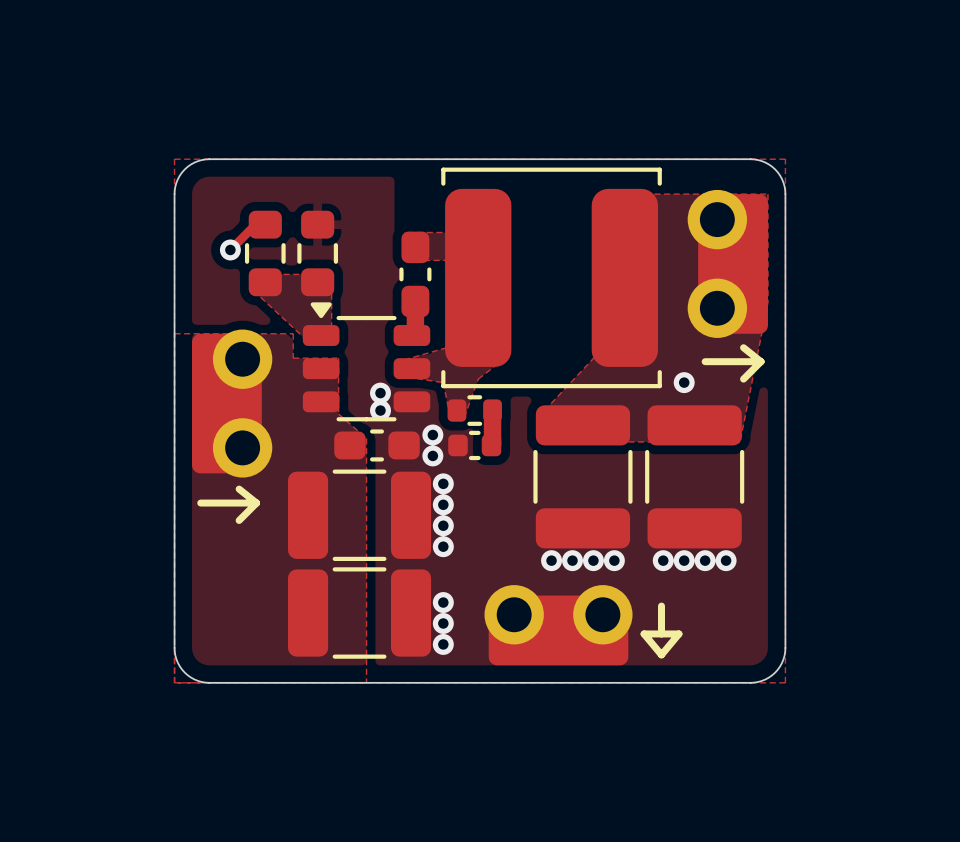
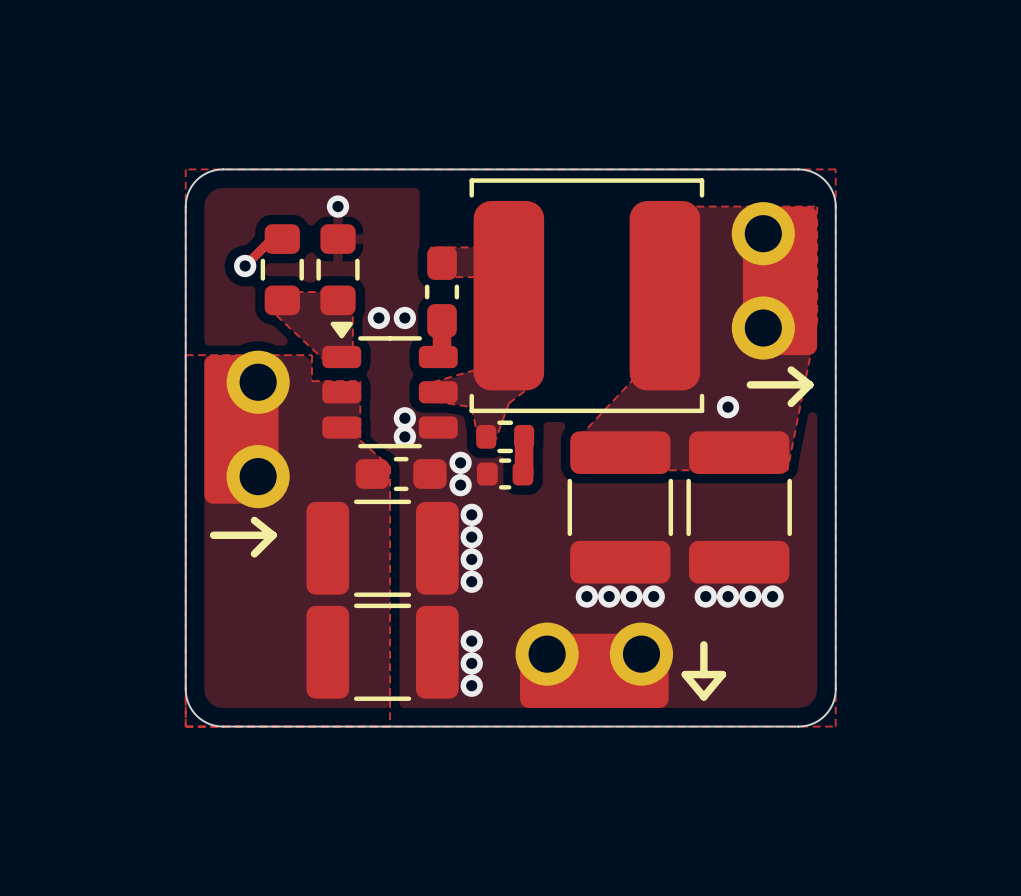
via: none -> (338, 206)
via: none -> (378, 317)
via: none -> (404, 317)

